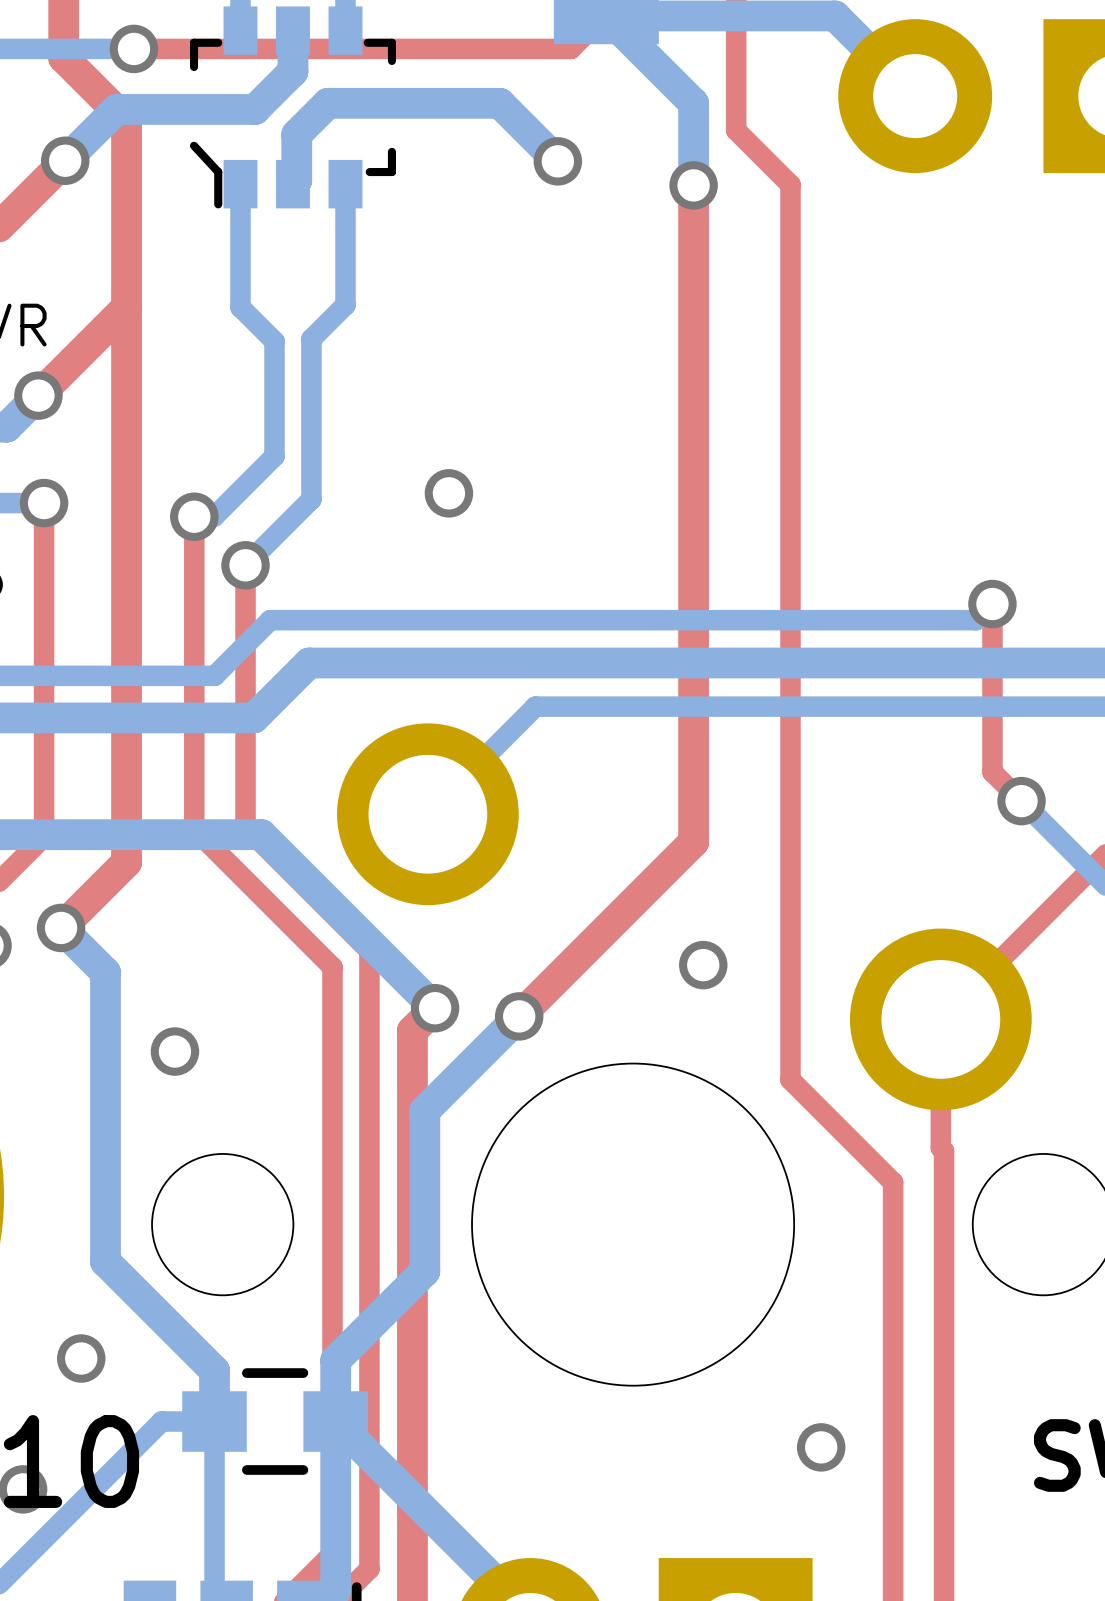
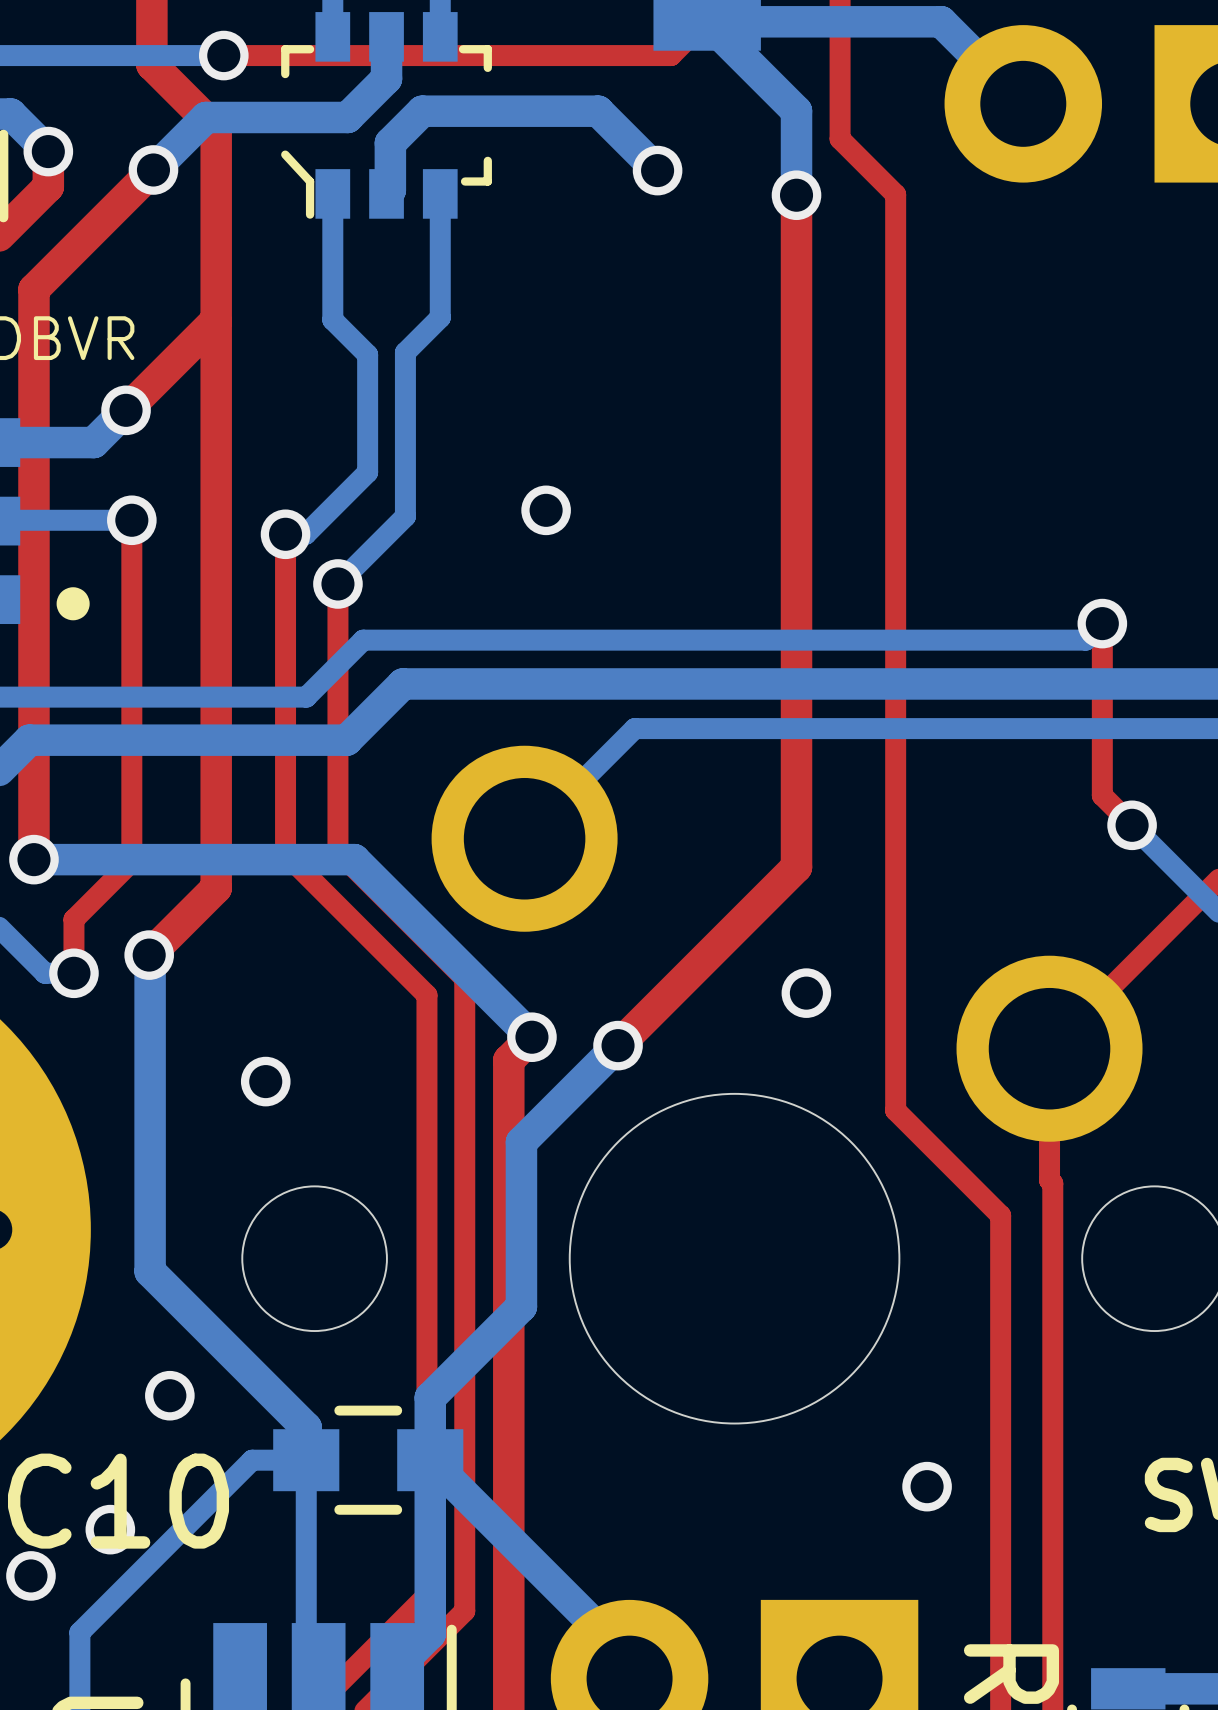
bottom track: (61, 928) (105, 972) (105, 1261) (214, 1370) (214, 1389) -> (150, 956) (150, 1271) (306, 1427)

